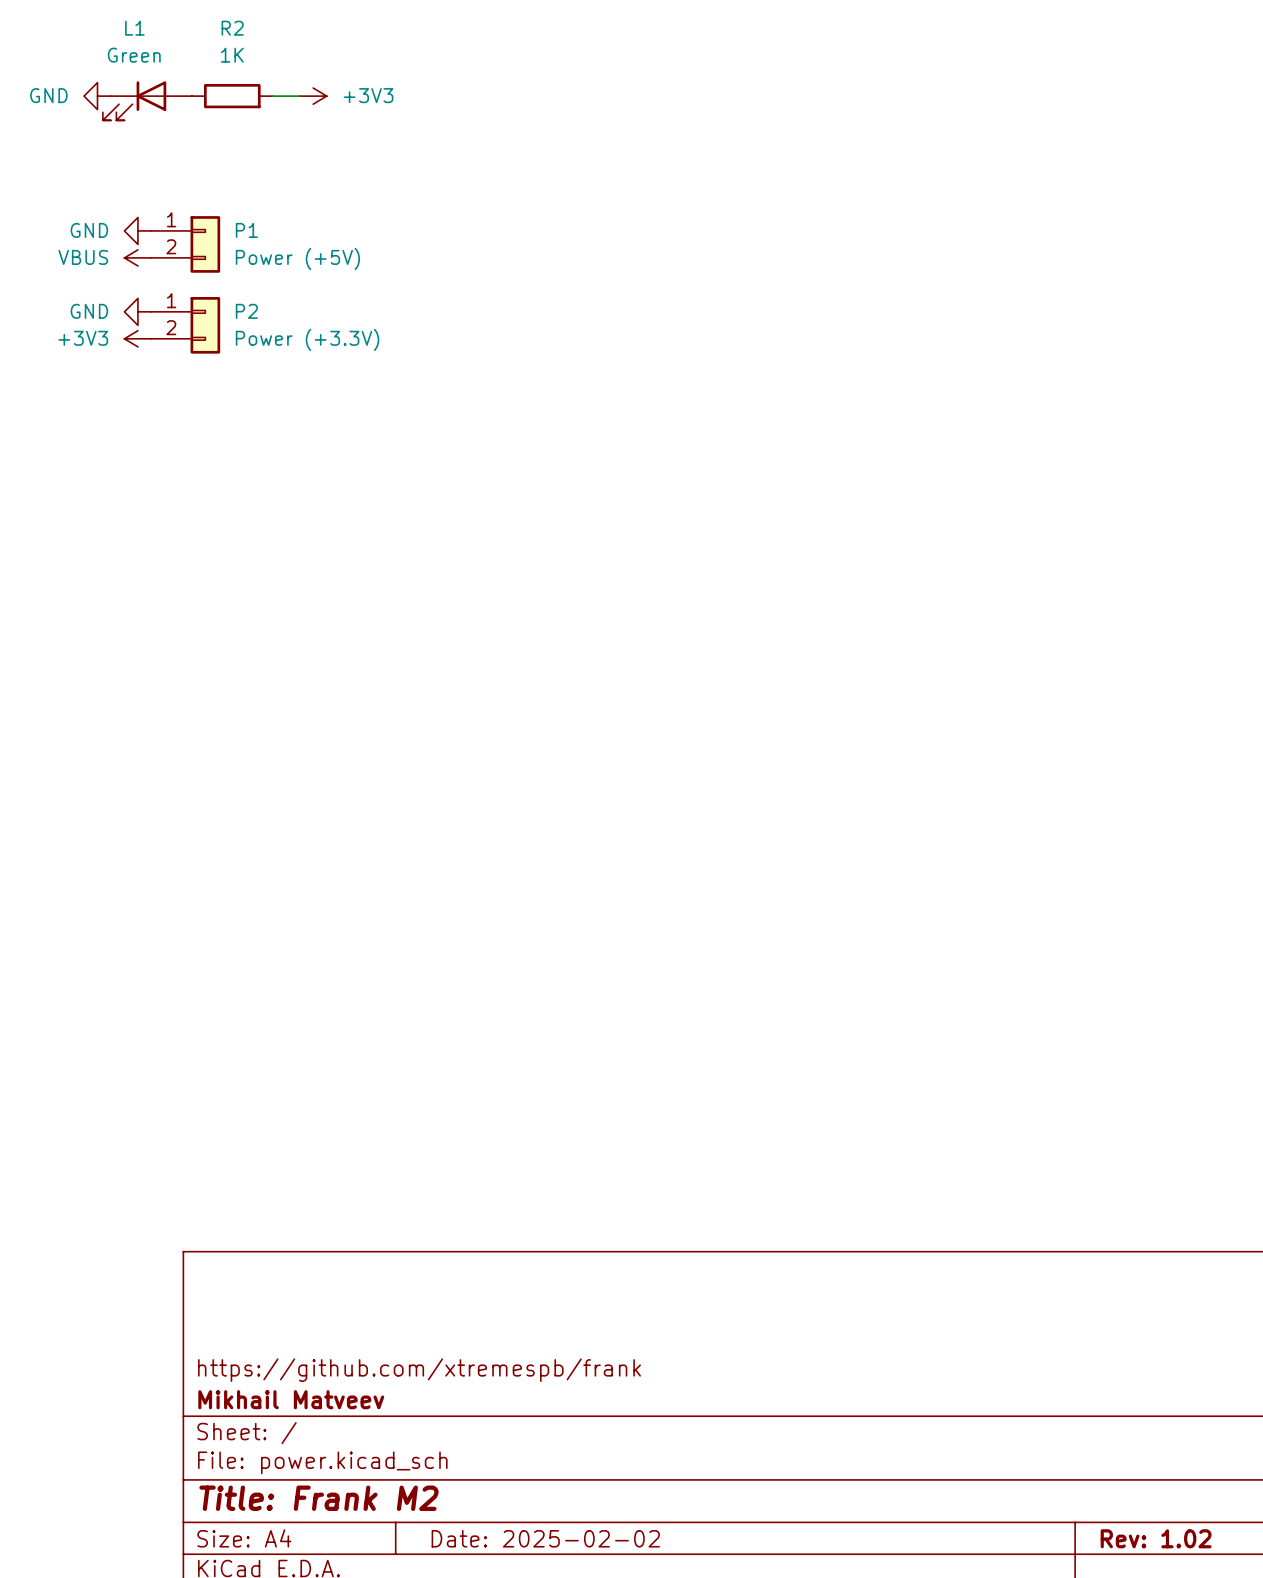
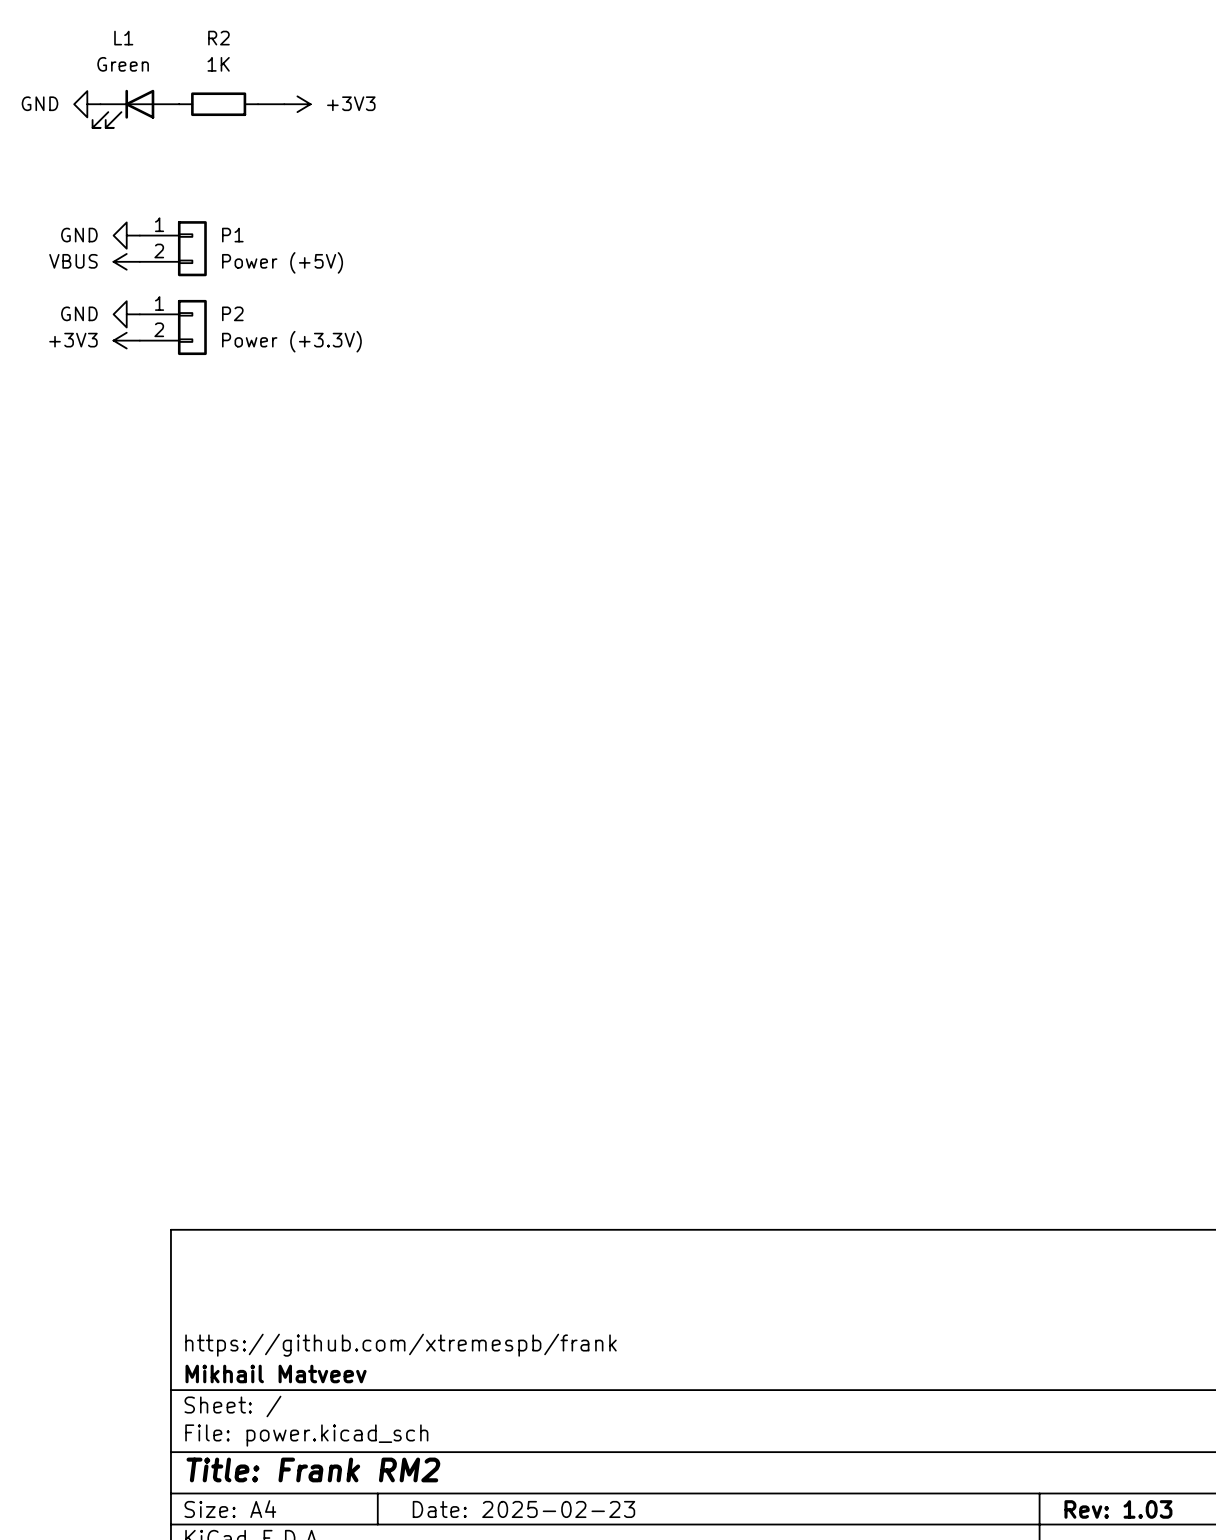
title block: Title: Frank M2 (319, 1498) -> Title: Frank RM2 (313, 1469)
title block: Date: 2025-02-02 (545, 1538) -> Date: 2025-02-23 (523, 1509)
title block: Rev: 1.02 (1156, 1538) -> Rev: 1.03 (1118, 1509)

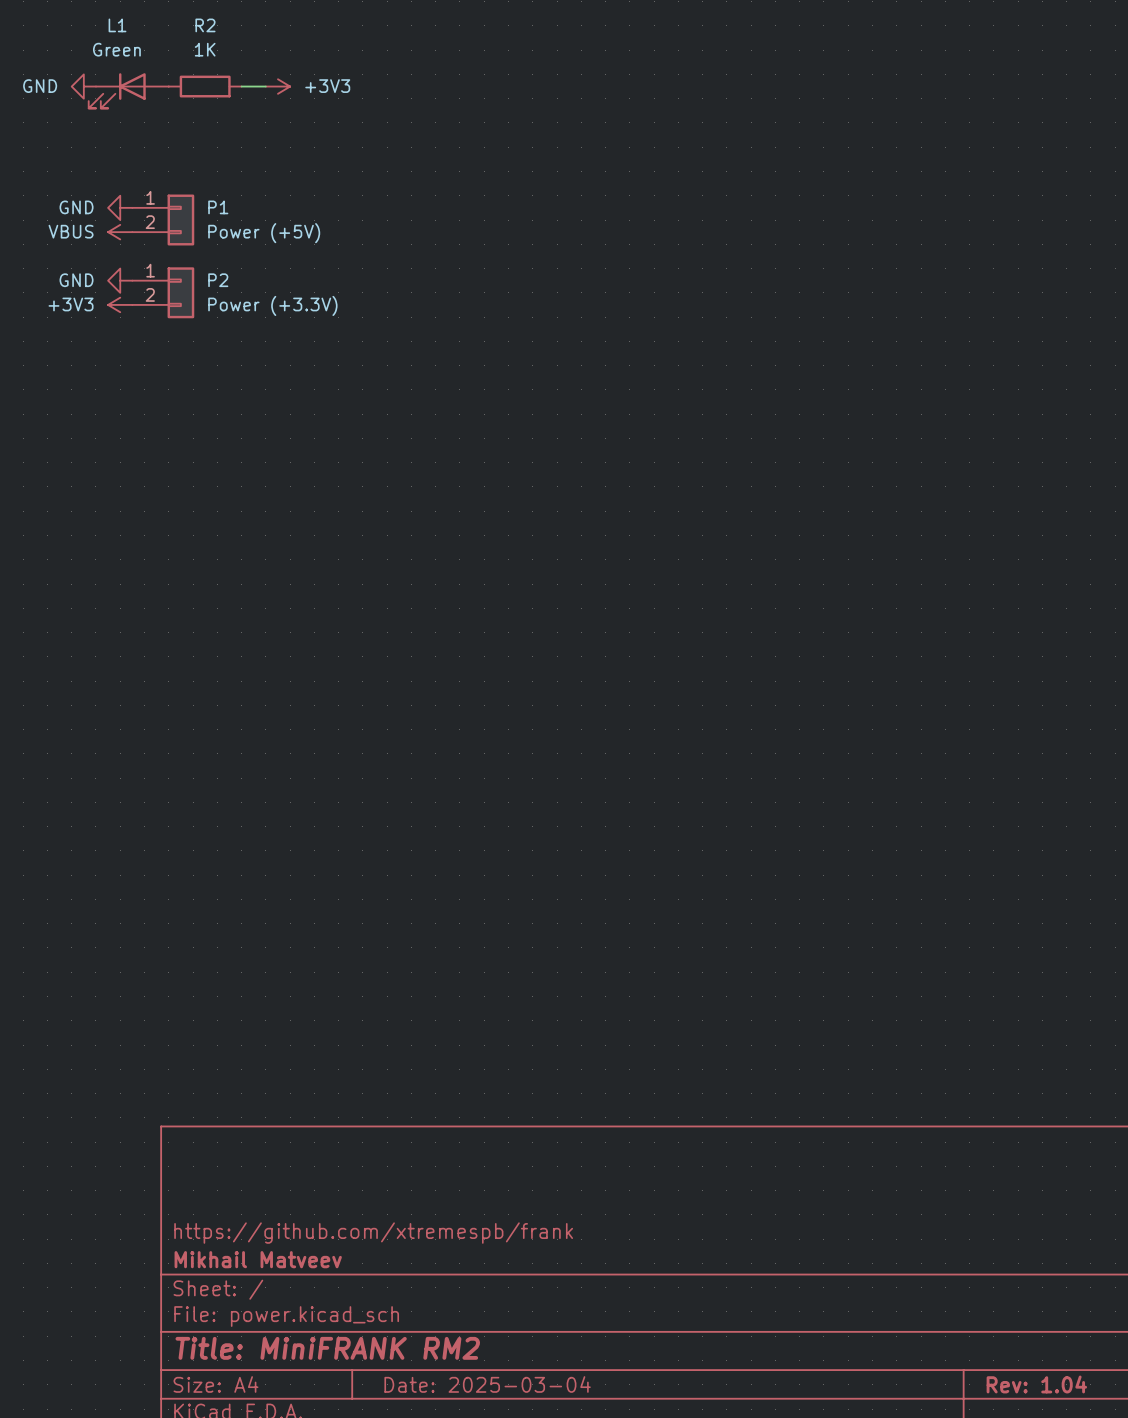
title block: Title: Frank RM2 (313, 1469) -> Title: MiniFRANK RM2 (327, 1348)
title block: Date: 2025-02-23 (523, 1509) -> Date: 2025-03-04 (487, 1384)
title block: Rev: 1.03 (1118, 1509) -> Rev: 1.04 (1036, 1384)

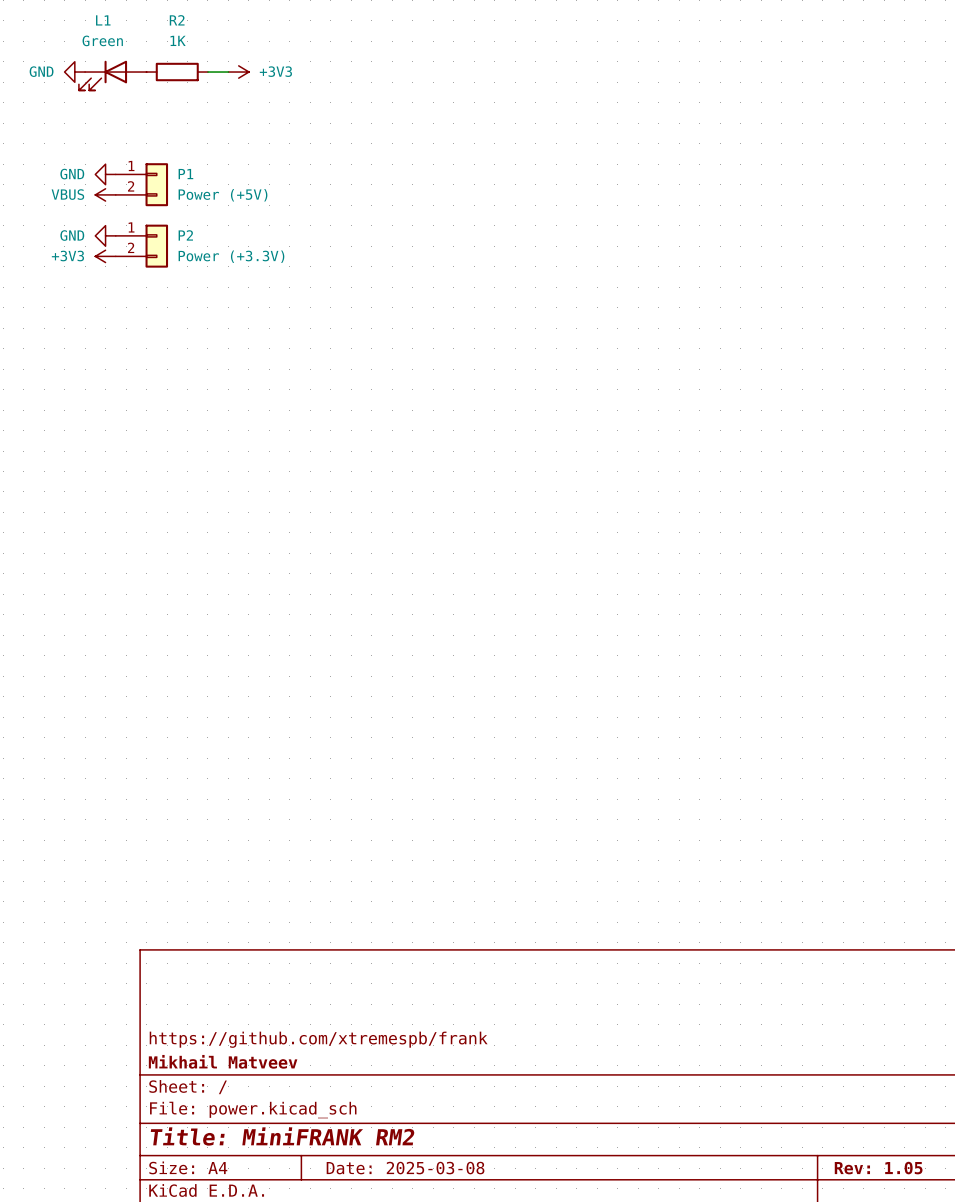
title block: Date: 2025-03-04 (487, 1384) -> Date: 2025-03-08 (405, 1168)
title block: Rev: 1.04 (1036, 1384) -> Rev: 1.05 (878, 1168)

